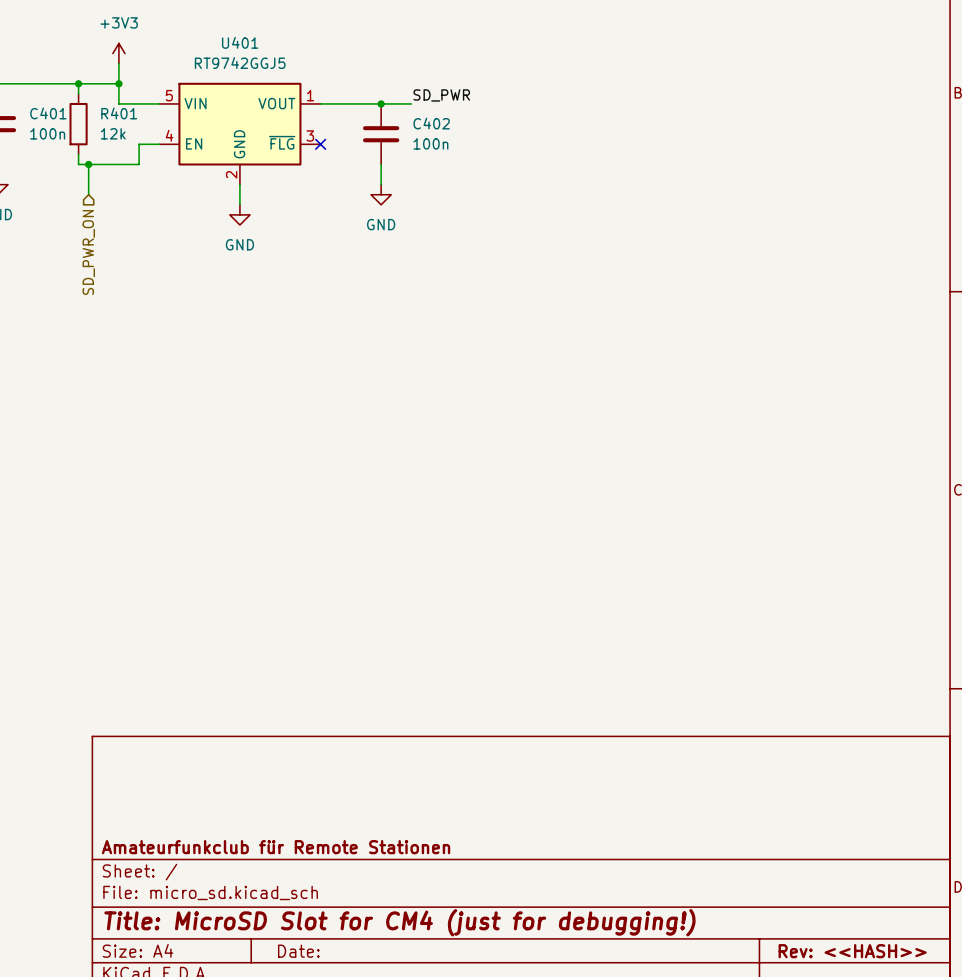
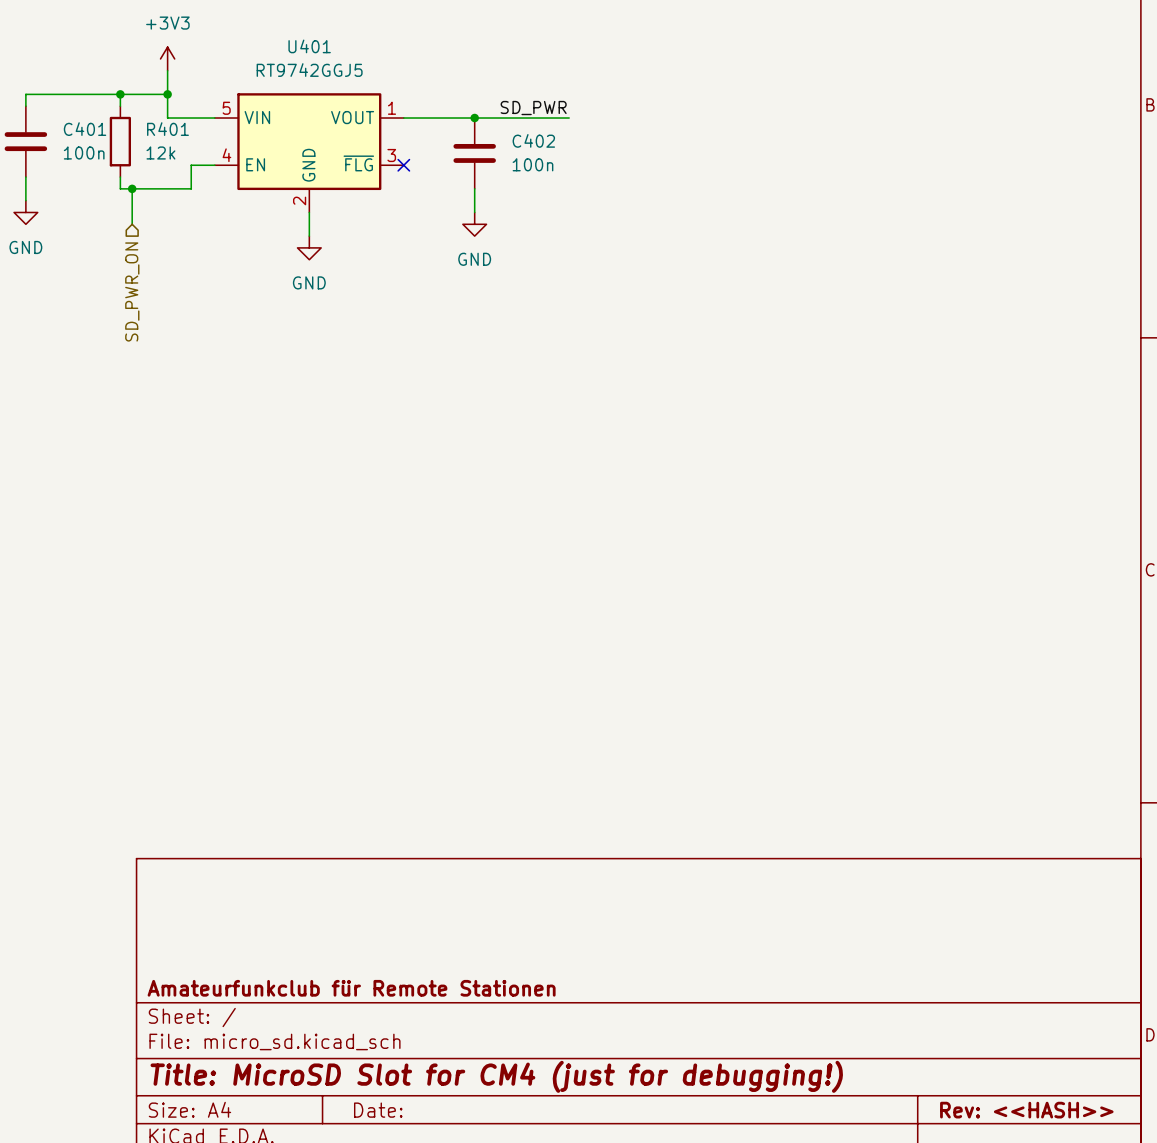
label position: SD_PWR (441, 95) -> SD_PWR (533, 108)
wire: none -> (510, 118) (569, 118)

